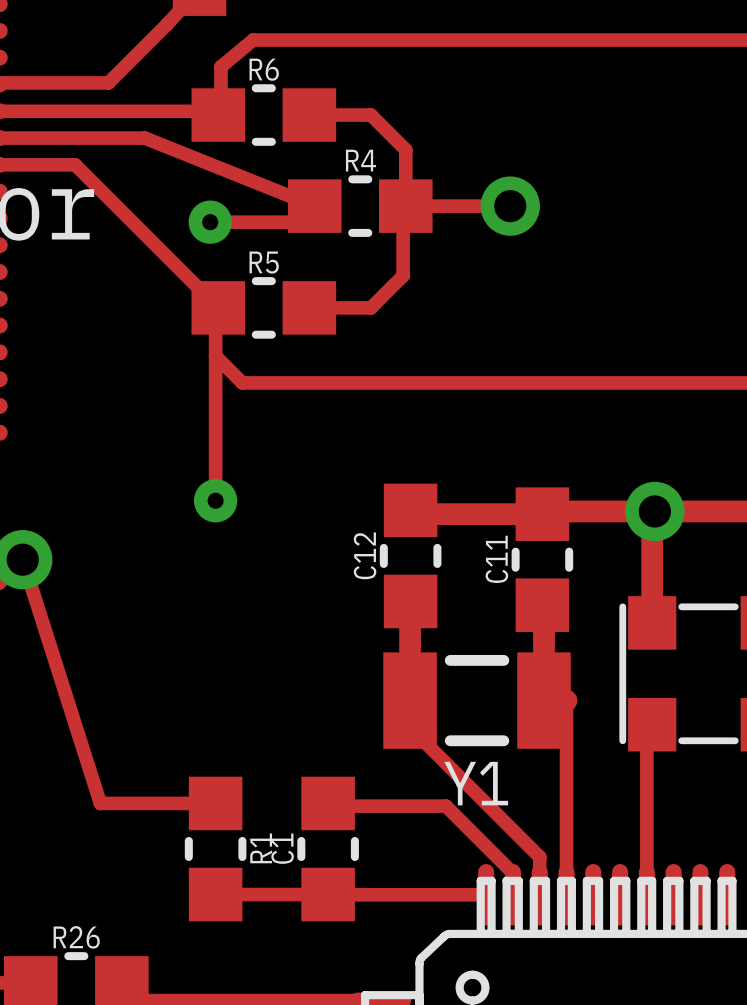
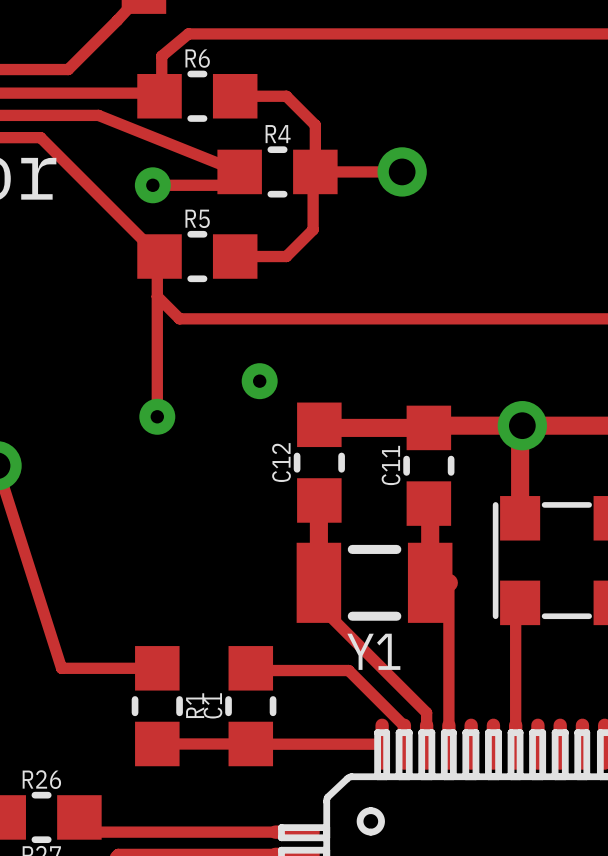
via: none -> (259, 381)

